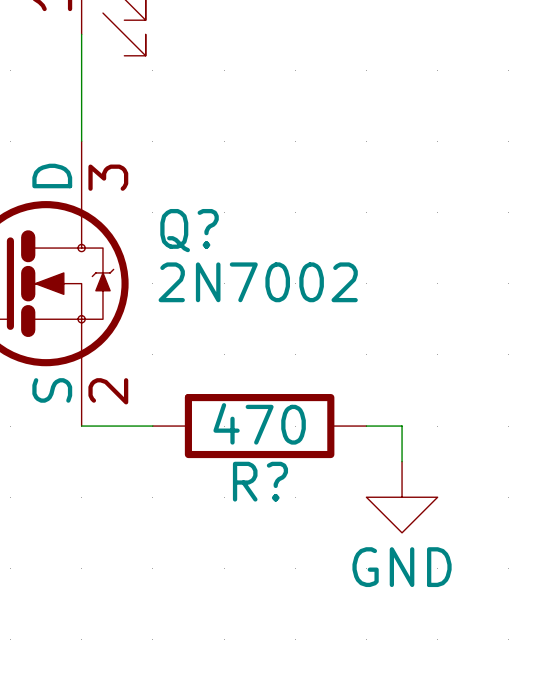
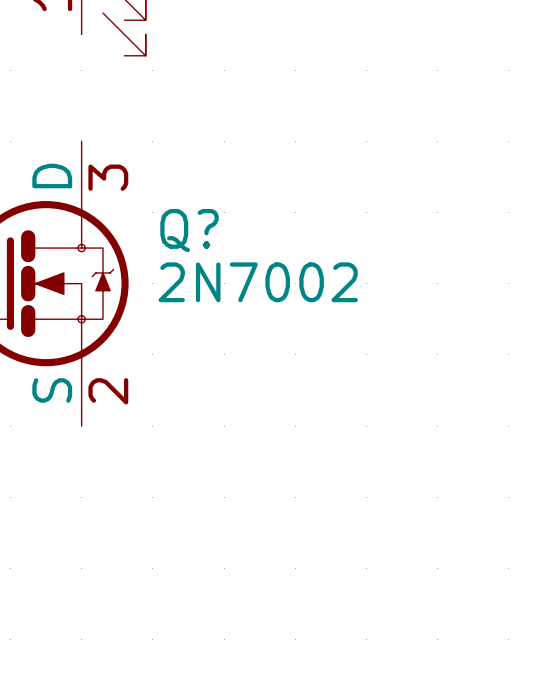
wire: (81, 34) (81, 141) -> none
wire: (81, 426) (152, 426) -> none
R?: 470 (259, 426) -> none
wire: (366, 426) (402, 426) (402, 461) -> none
power symbol: GND (402, 497) -> none

